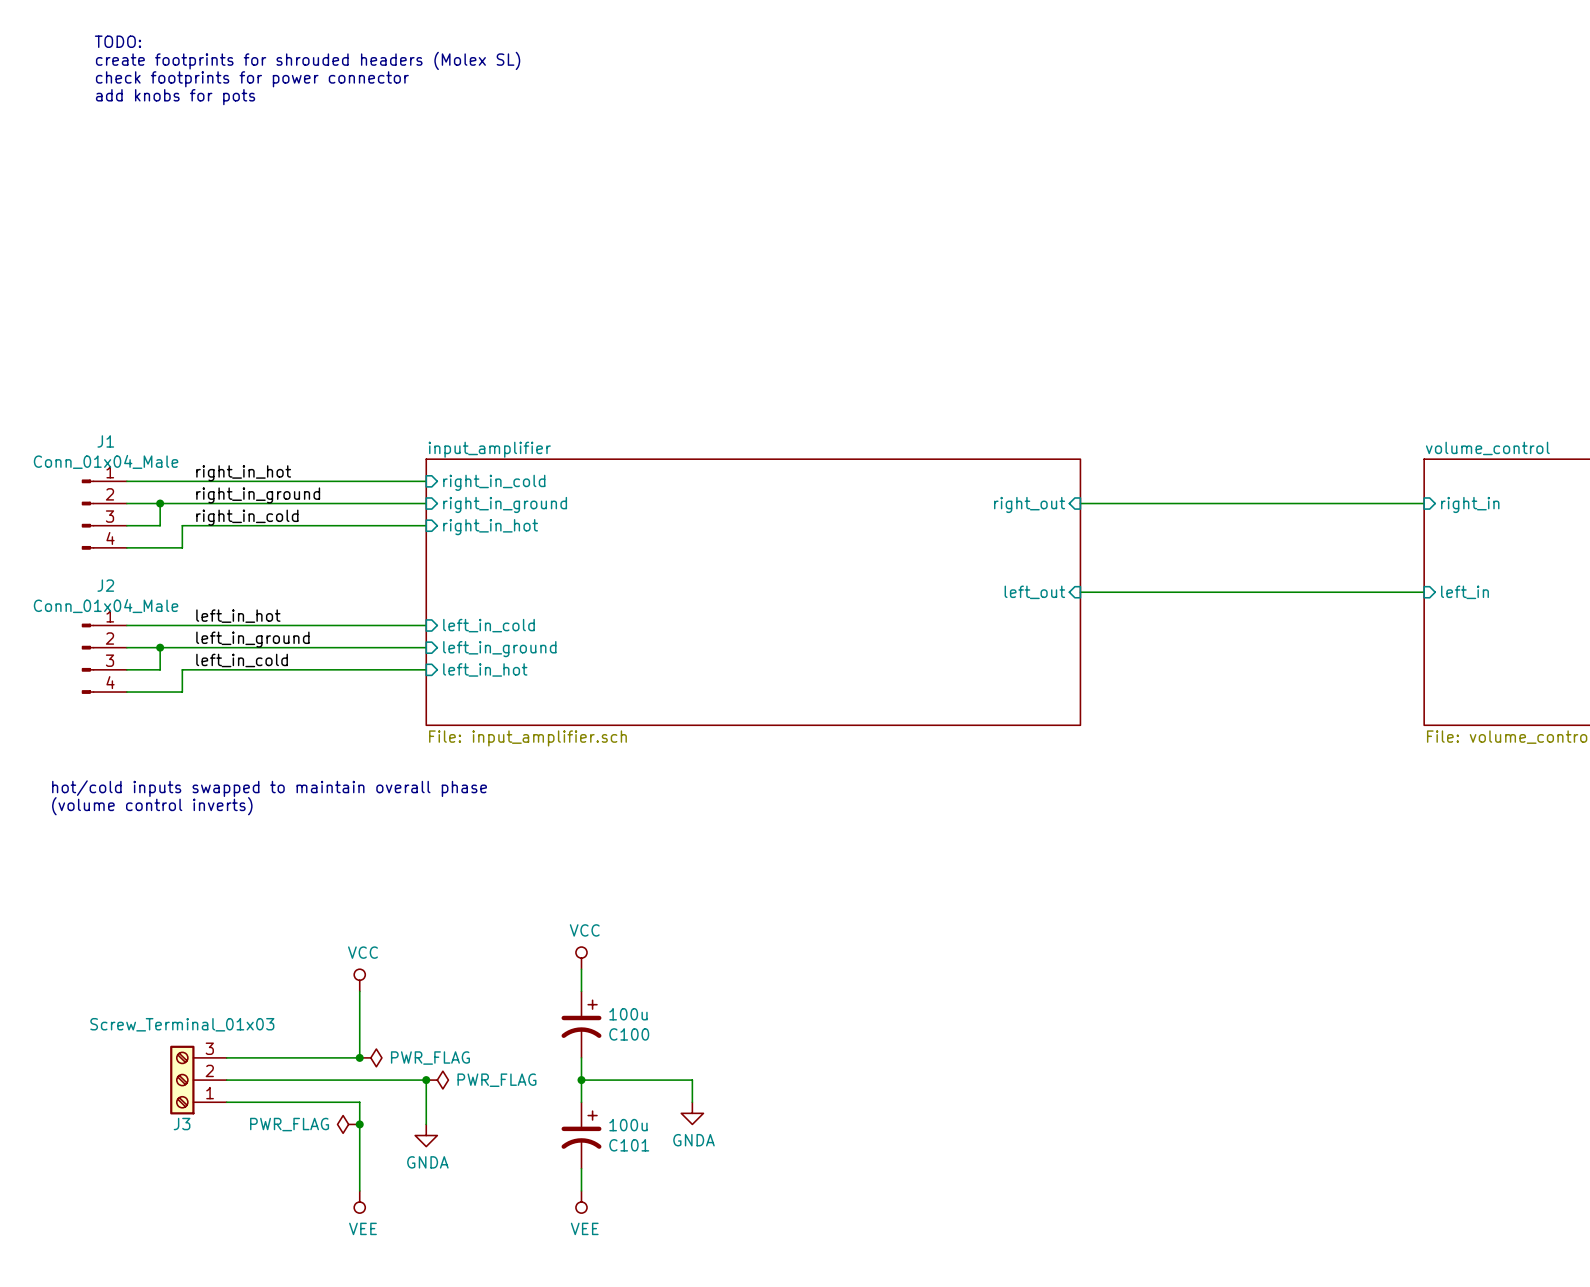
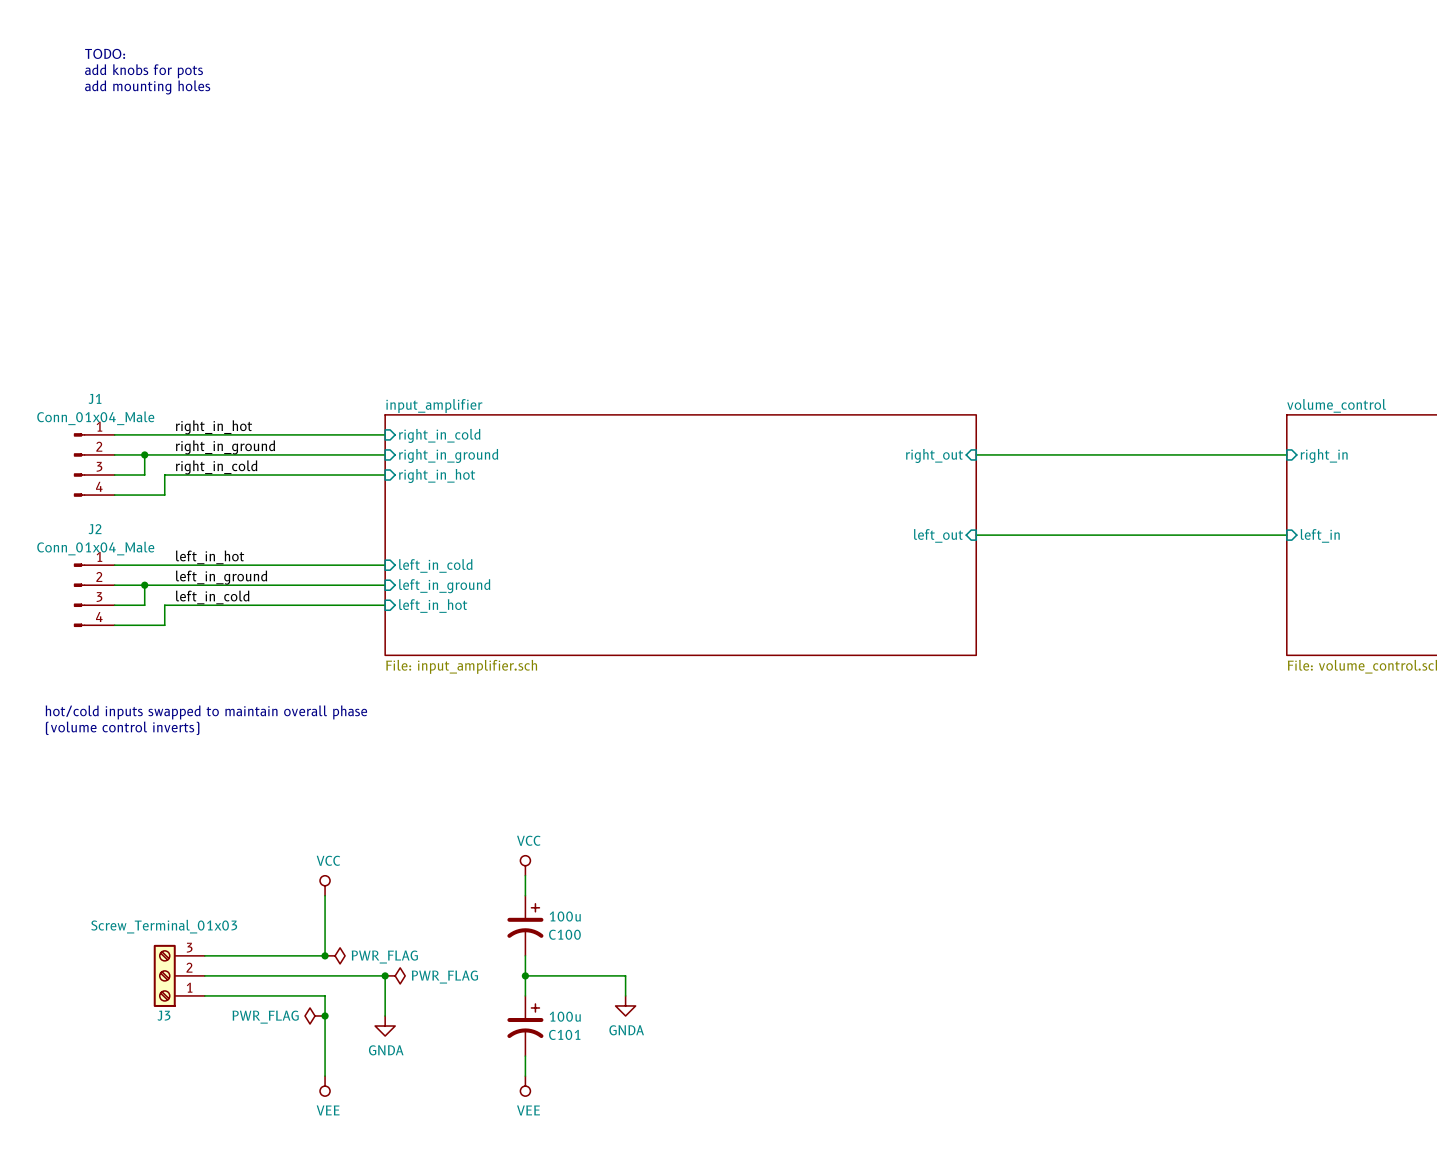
text: TODO: (118, 41) -> none
text: create footprints for shrouded headers (Molex SL) (308, 60) -> TODO: (105, 53)
text: check footprints for power connector (252, 79) -> add knobs for pots (144, 71)
text: add knobs for pots (175, 97) -> add mounting holes (147, 87)

